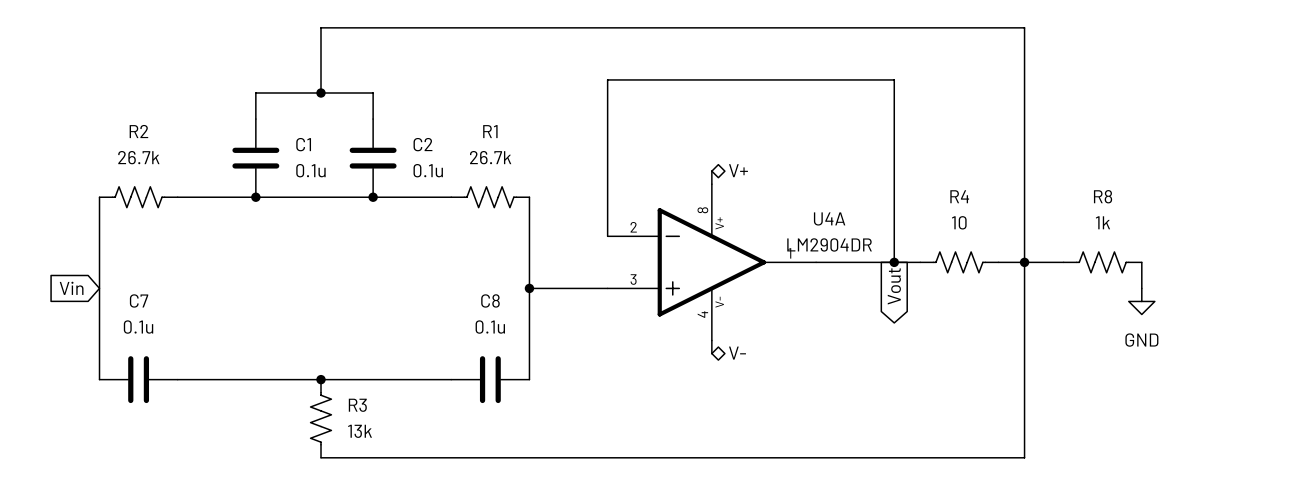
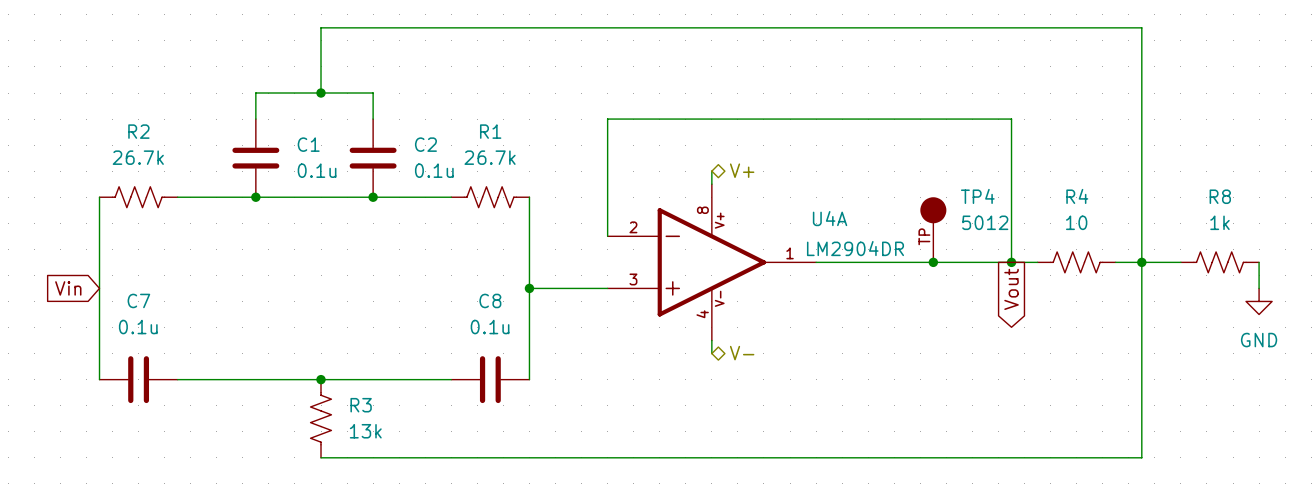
wire: (1024, 27) (1024, 457) -> (1024, 27) (1141, 27) (1141, 262)
wire: (607, 119) (607, 79) (894, 79) (894, 262) -> (607, 119) (1011, 119) (1011, 262)
TP4: none -> 5012 (933, 229)
U4A value position: LM2904DR (829, 244) -> LM2904DR (855, 248)
junction position: (894, 262) -> (933, 262)
R4 position: (959, 262) -> (1076, 262)
junction position: (1024, 262) -> (1011, 262)
R8 position: (1102, 262) -> (1219, 262)
wire: none -> (1115, 262) (1180, 262)
junction: none -> (1141, 262)
wire: none -> (1259, 262) (1259, 288)
global label position: Vout (894, 286) -> Vout (1011, 289)
wire: none -> (1141, 288) (1141, 457) (1024, 457)
power symbol position: GND (1141, 301) -> GND (1259, 301)

